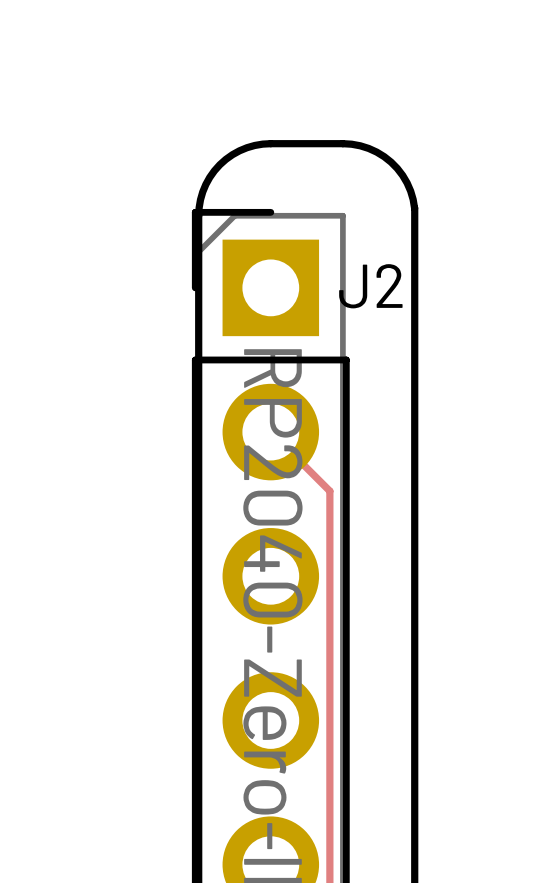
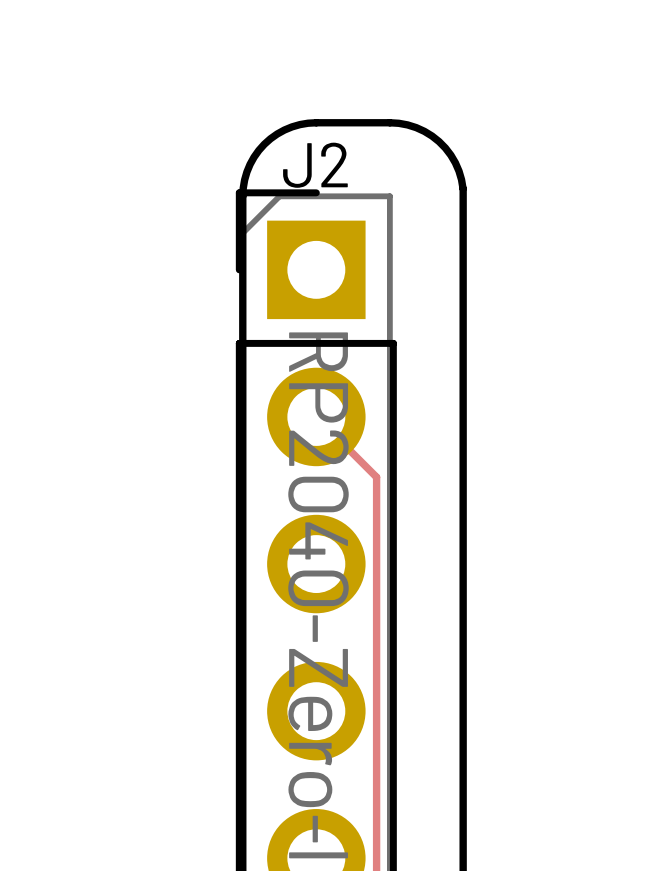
J2 name position: J2 (370, 286) -> J2 (315, 165)

